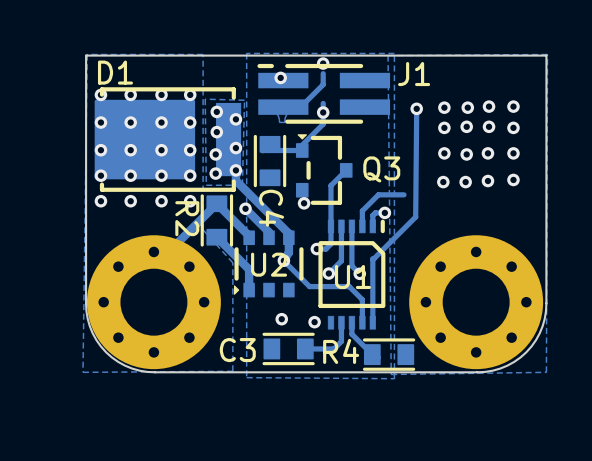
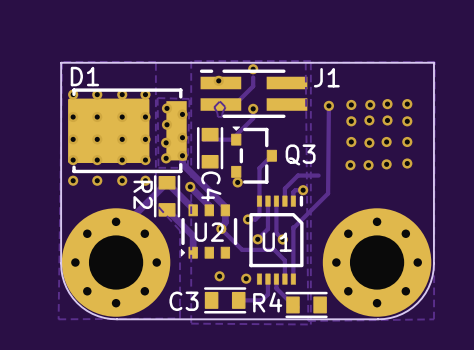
track: (323, 103) (323, 112) -> none

